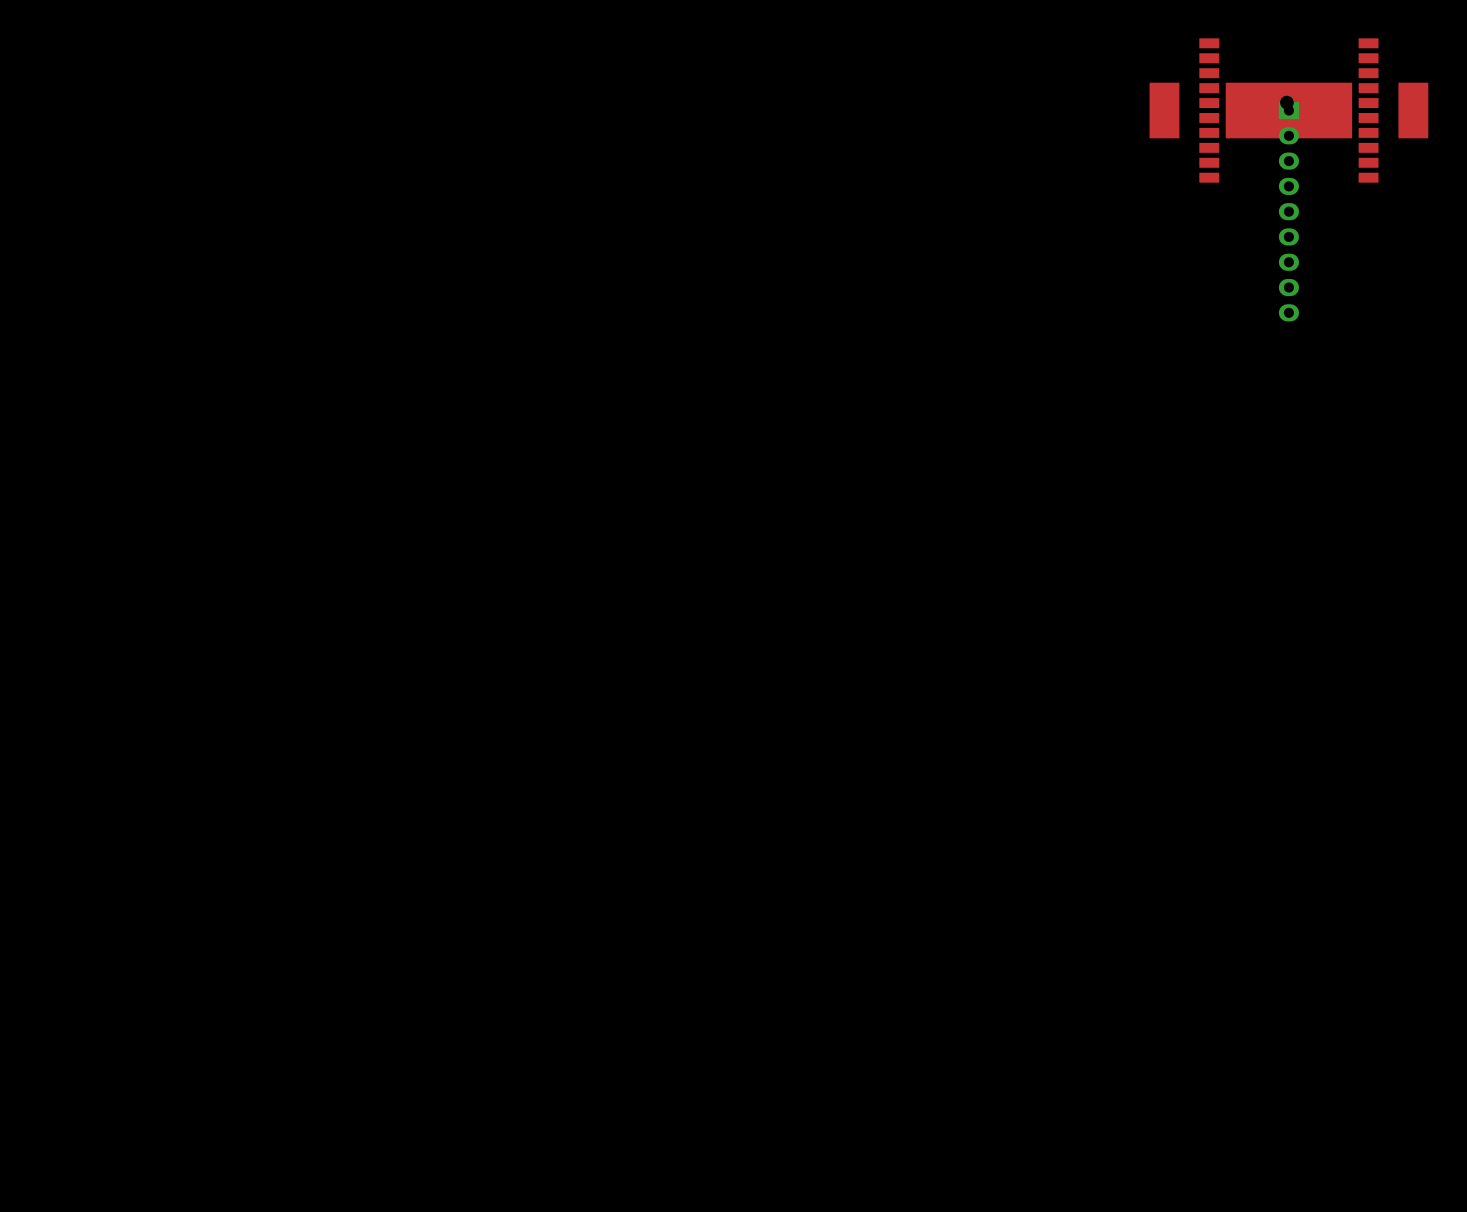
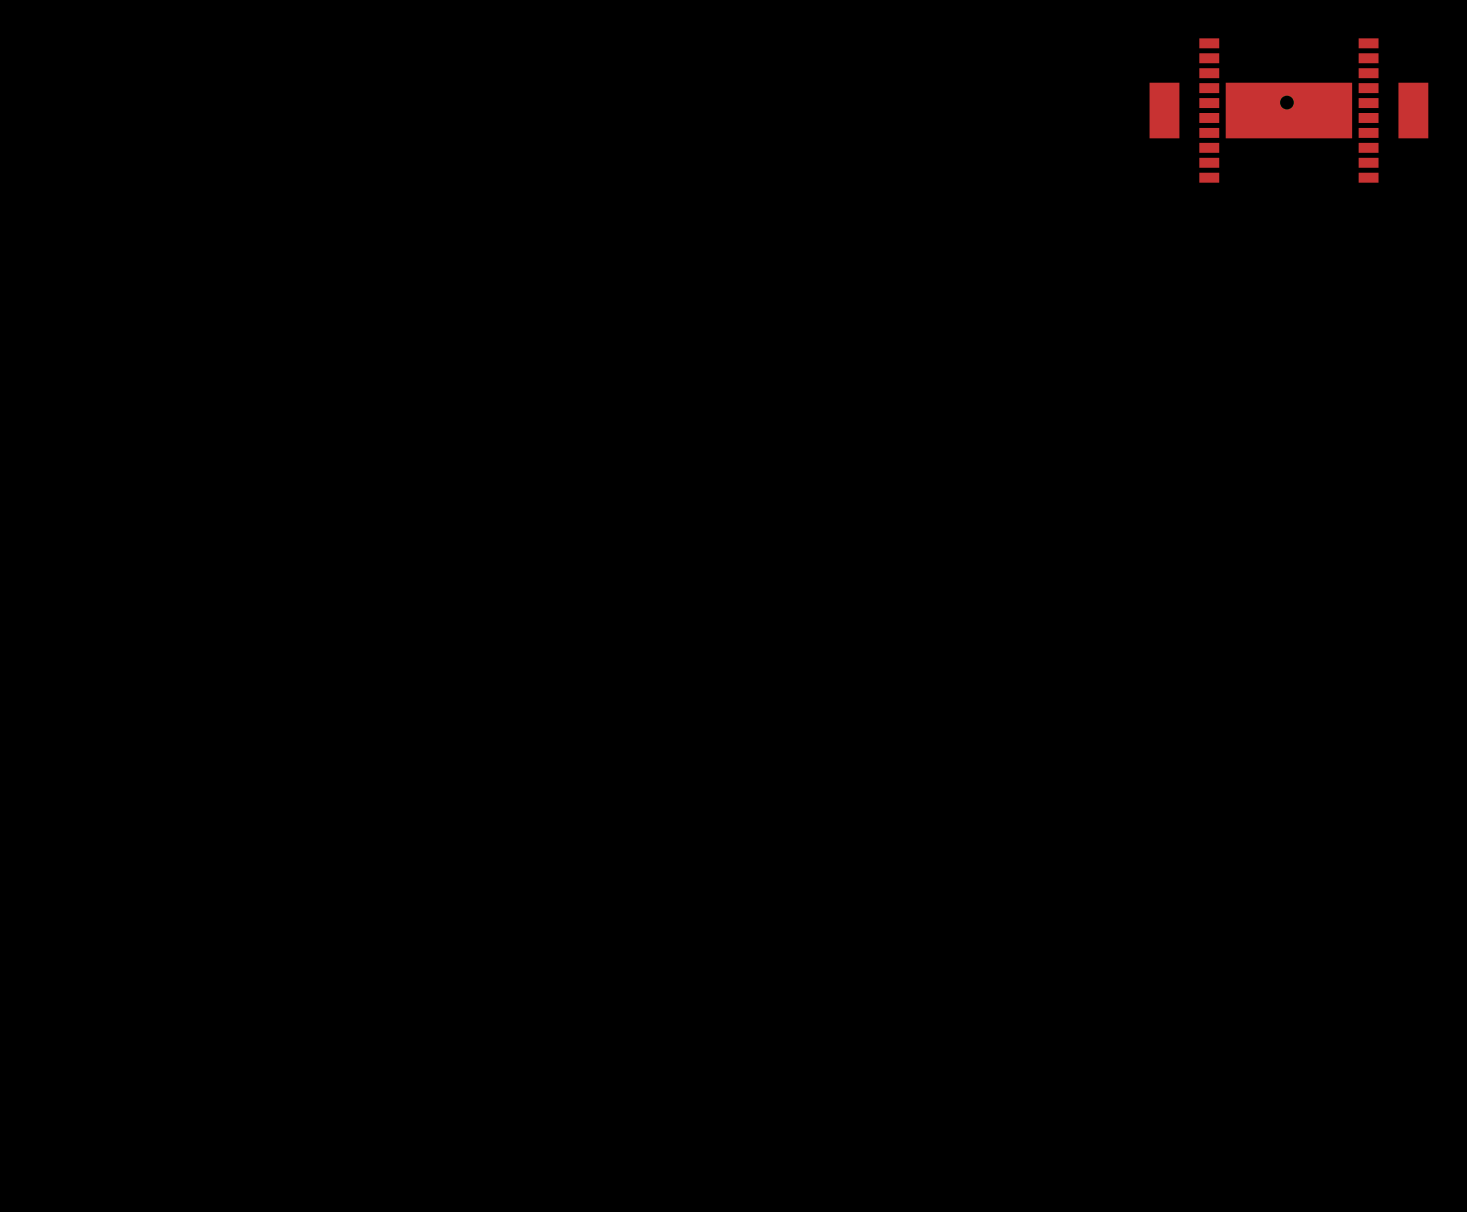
part: (1288, 211) -> none

